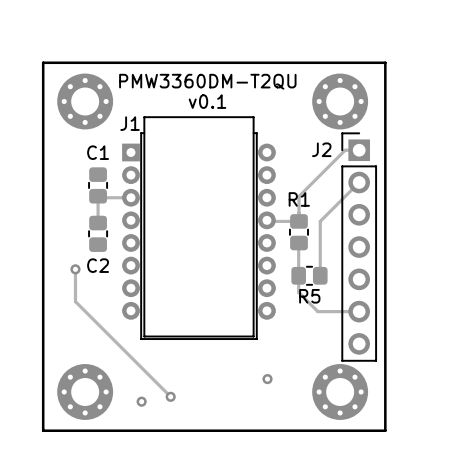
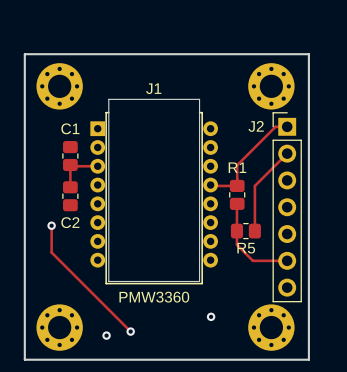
text: PMW3360DM-T2QU (207, 81) -> none
text: v0.1 (207, 101) -> none
J1 name position: J1 (130, 123) -> J1 (153, 88)
J1 value: none -> PMW3360 (154, 297)

